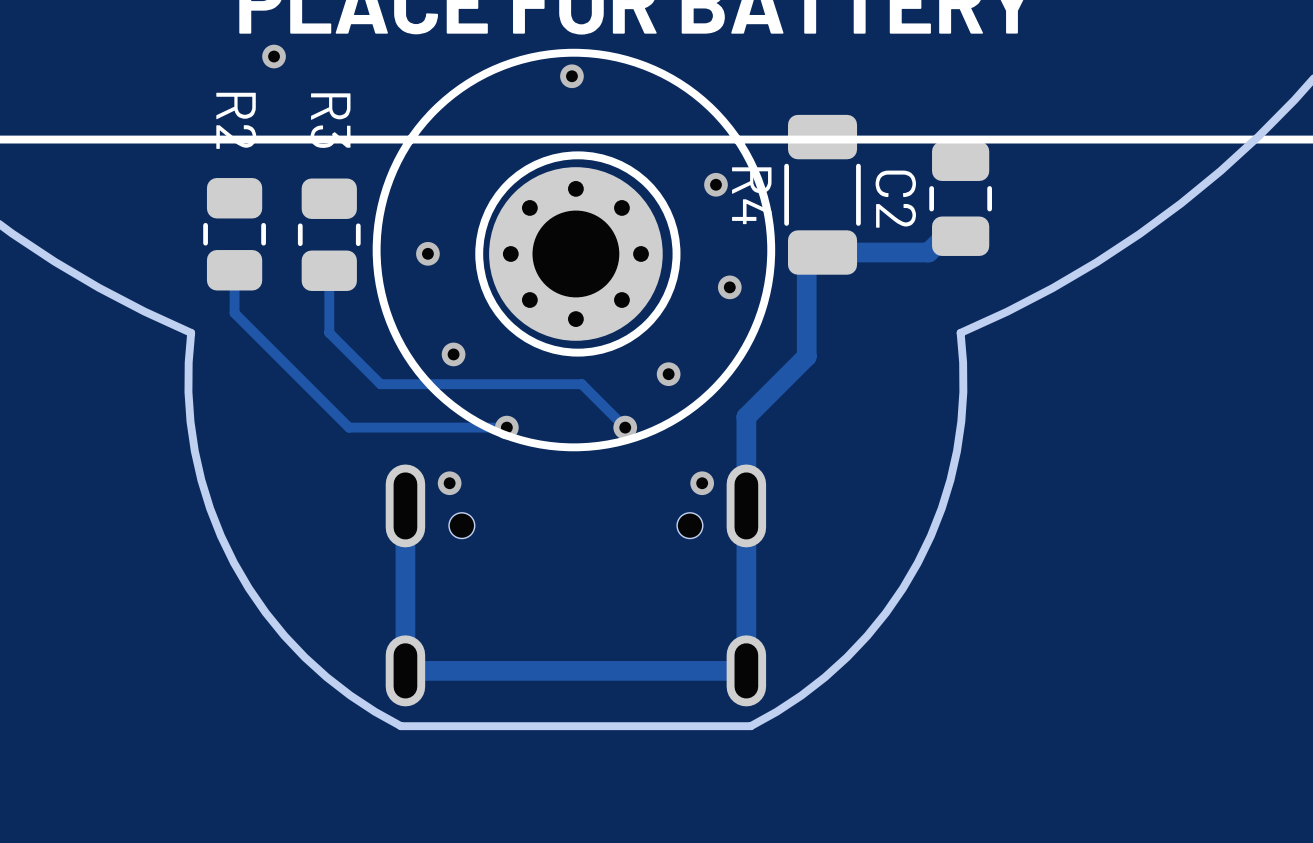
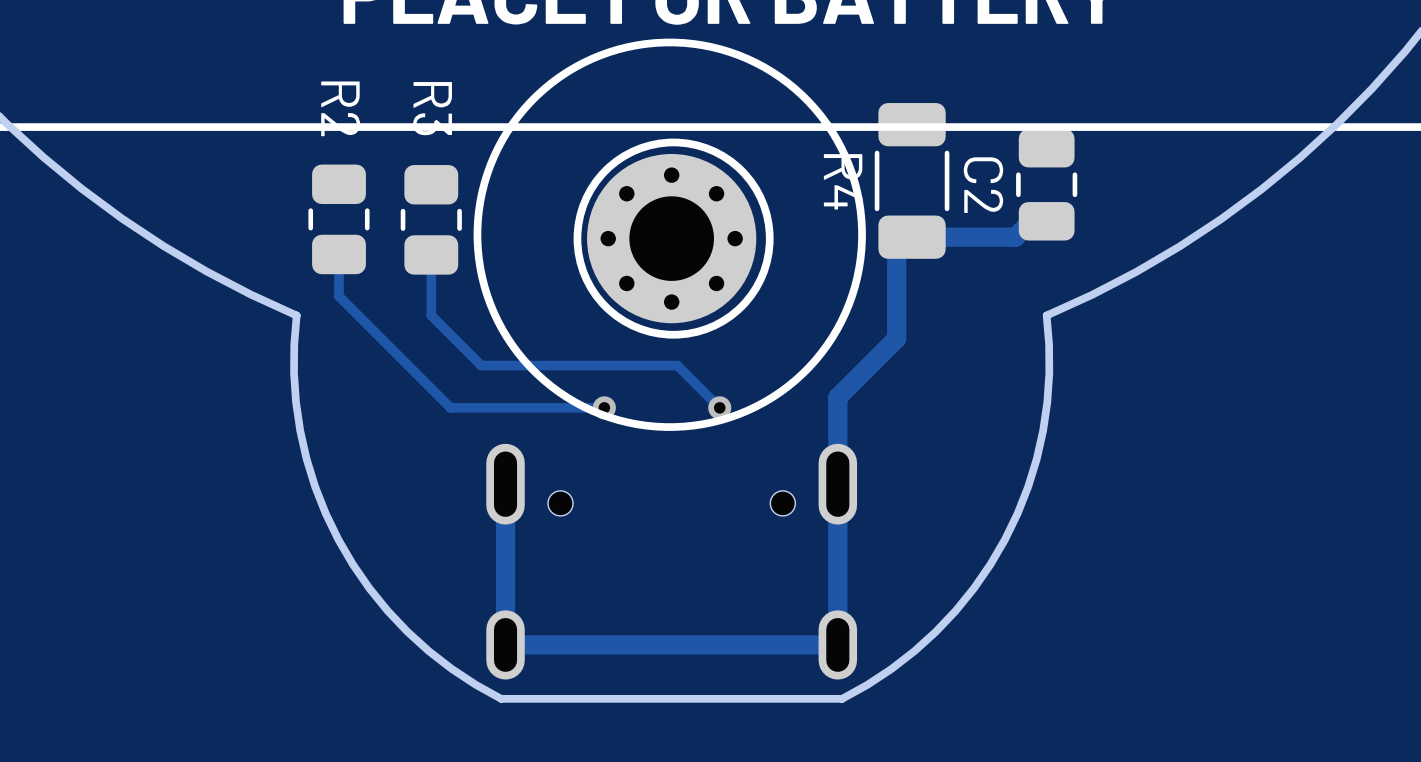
via: (274, 56) -> none
via: (571, 76) -> none
via: (715, 184) -> none
via: (427, 253) -> none
via: (729, 287) -> none
via: (453, 354) -> none
via: (668, 374) -> none
via: (449, 483) -> none
via: (702, 483) -> none

